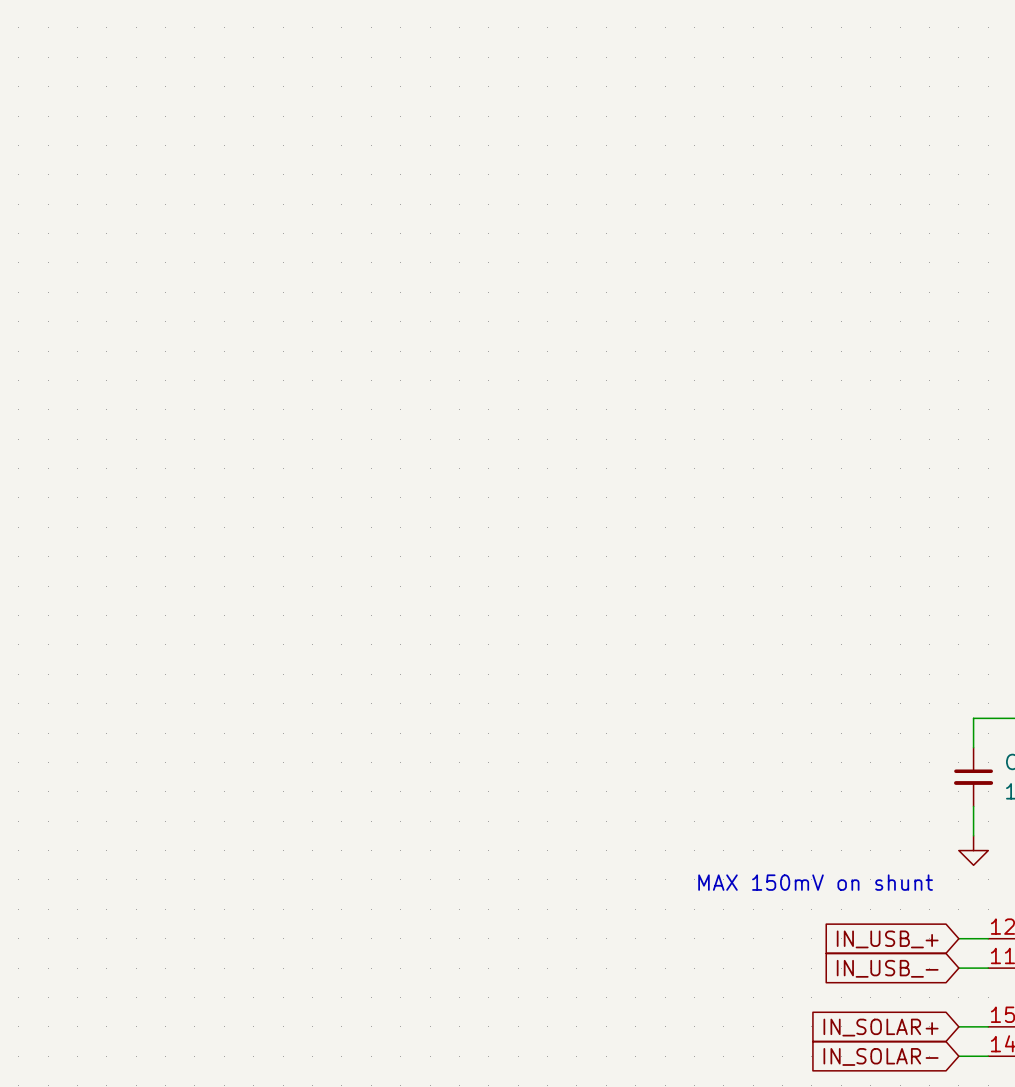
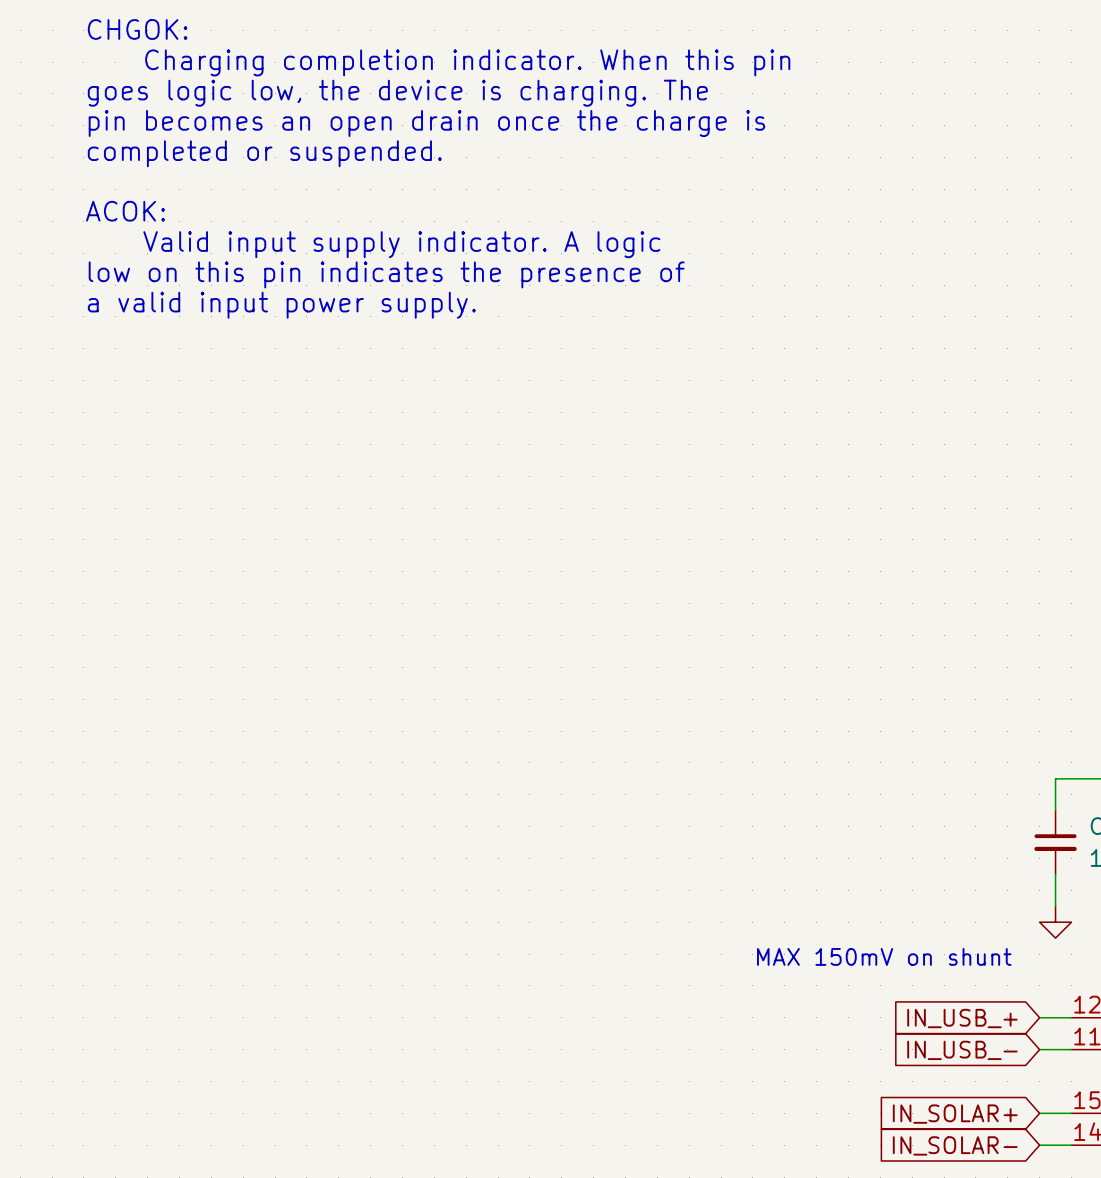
text: none -> CHGOK: (137, 29)
text: none -> Charging completion indicator. When this pin (467, 62)
text: none -> goes logic low, the device is charging. The (397, 93)
text: none -> pin becomes an open drain once the charge is (426, 123)
text: none -> completed or suspended. (264, 153)
text: none -> ACOK: (125, 211)
text: none -> Valid input supply indicator. A logic (401, 244)
text: none -> low on this pin indicates the presence of (386, 274)
text: none -> a valid input power supply. (281, 305)

